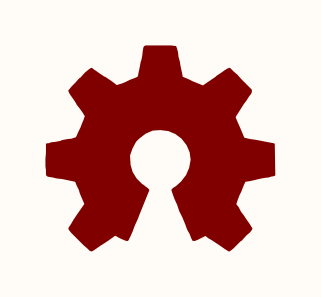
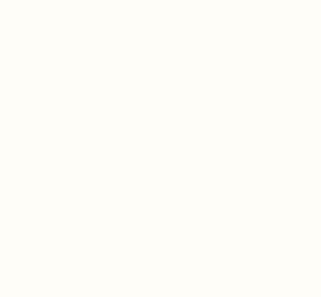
power symbol: (160, 148) -> none

